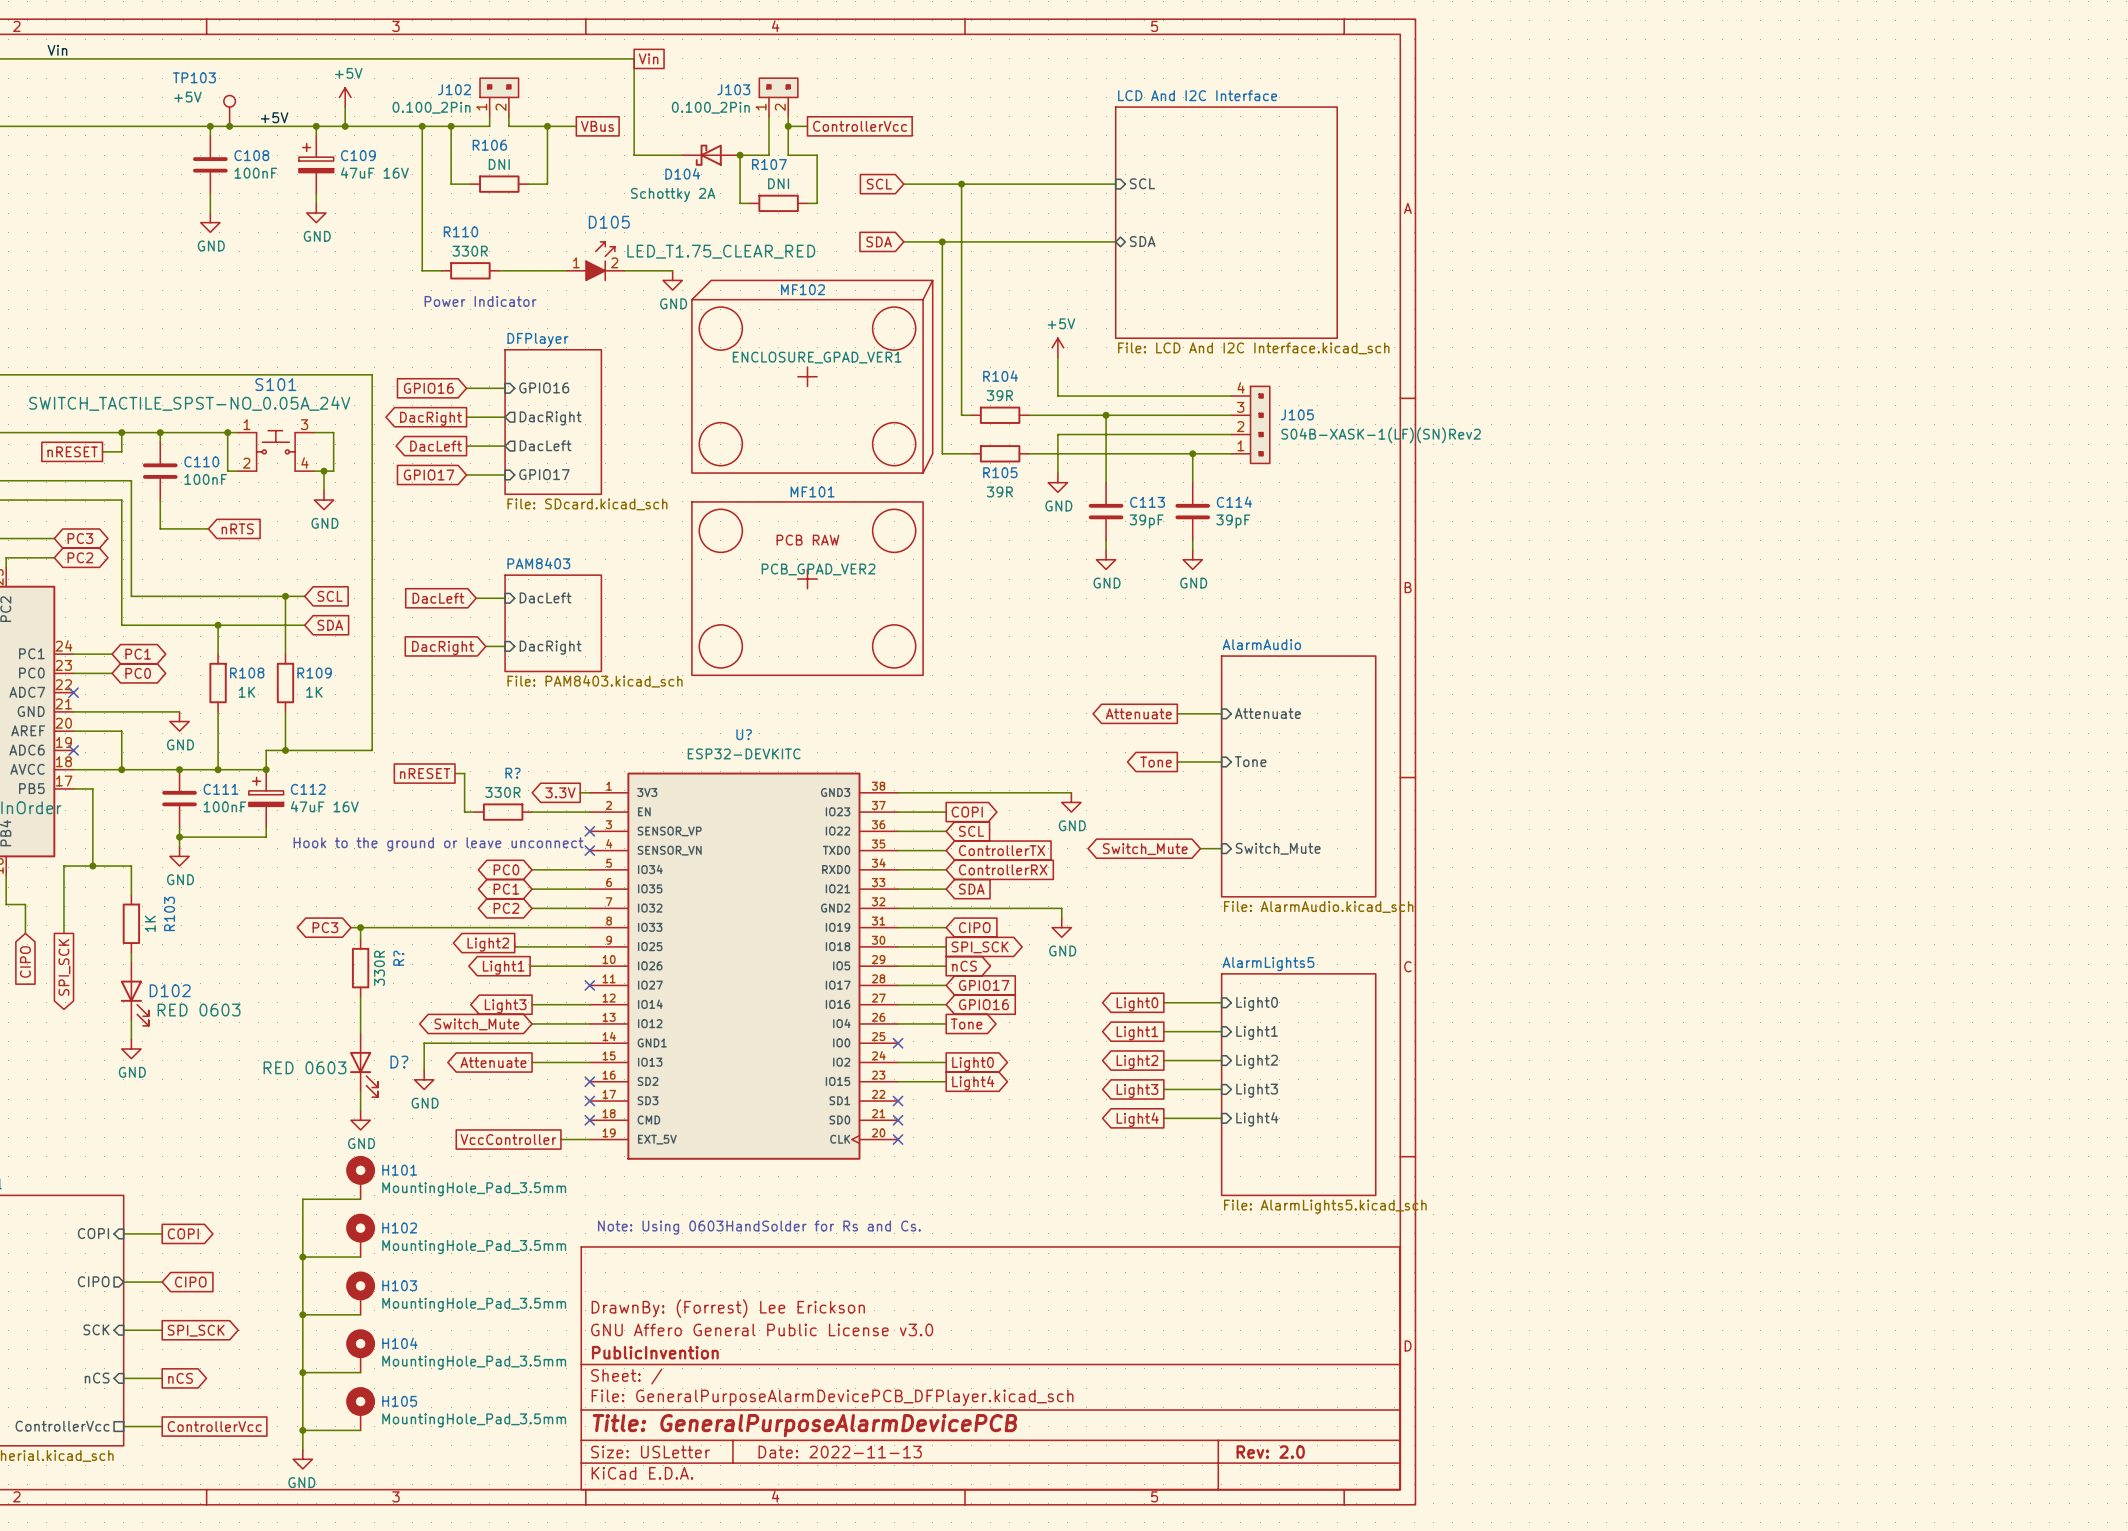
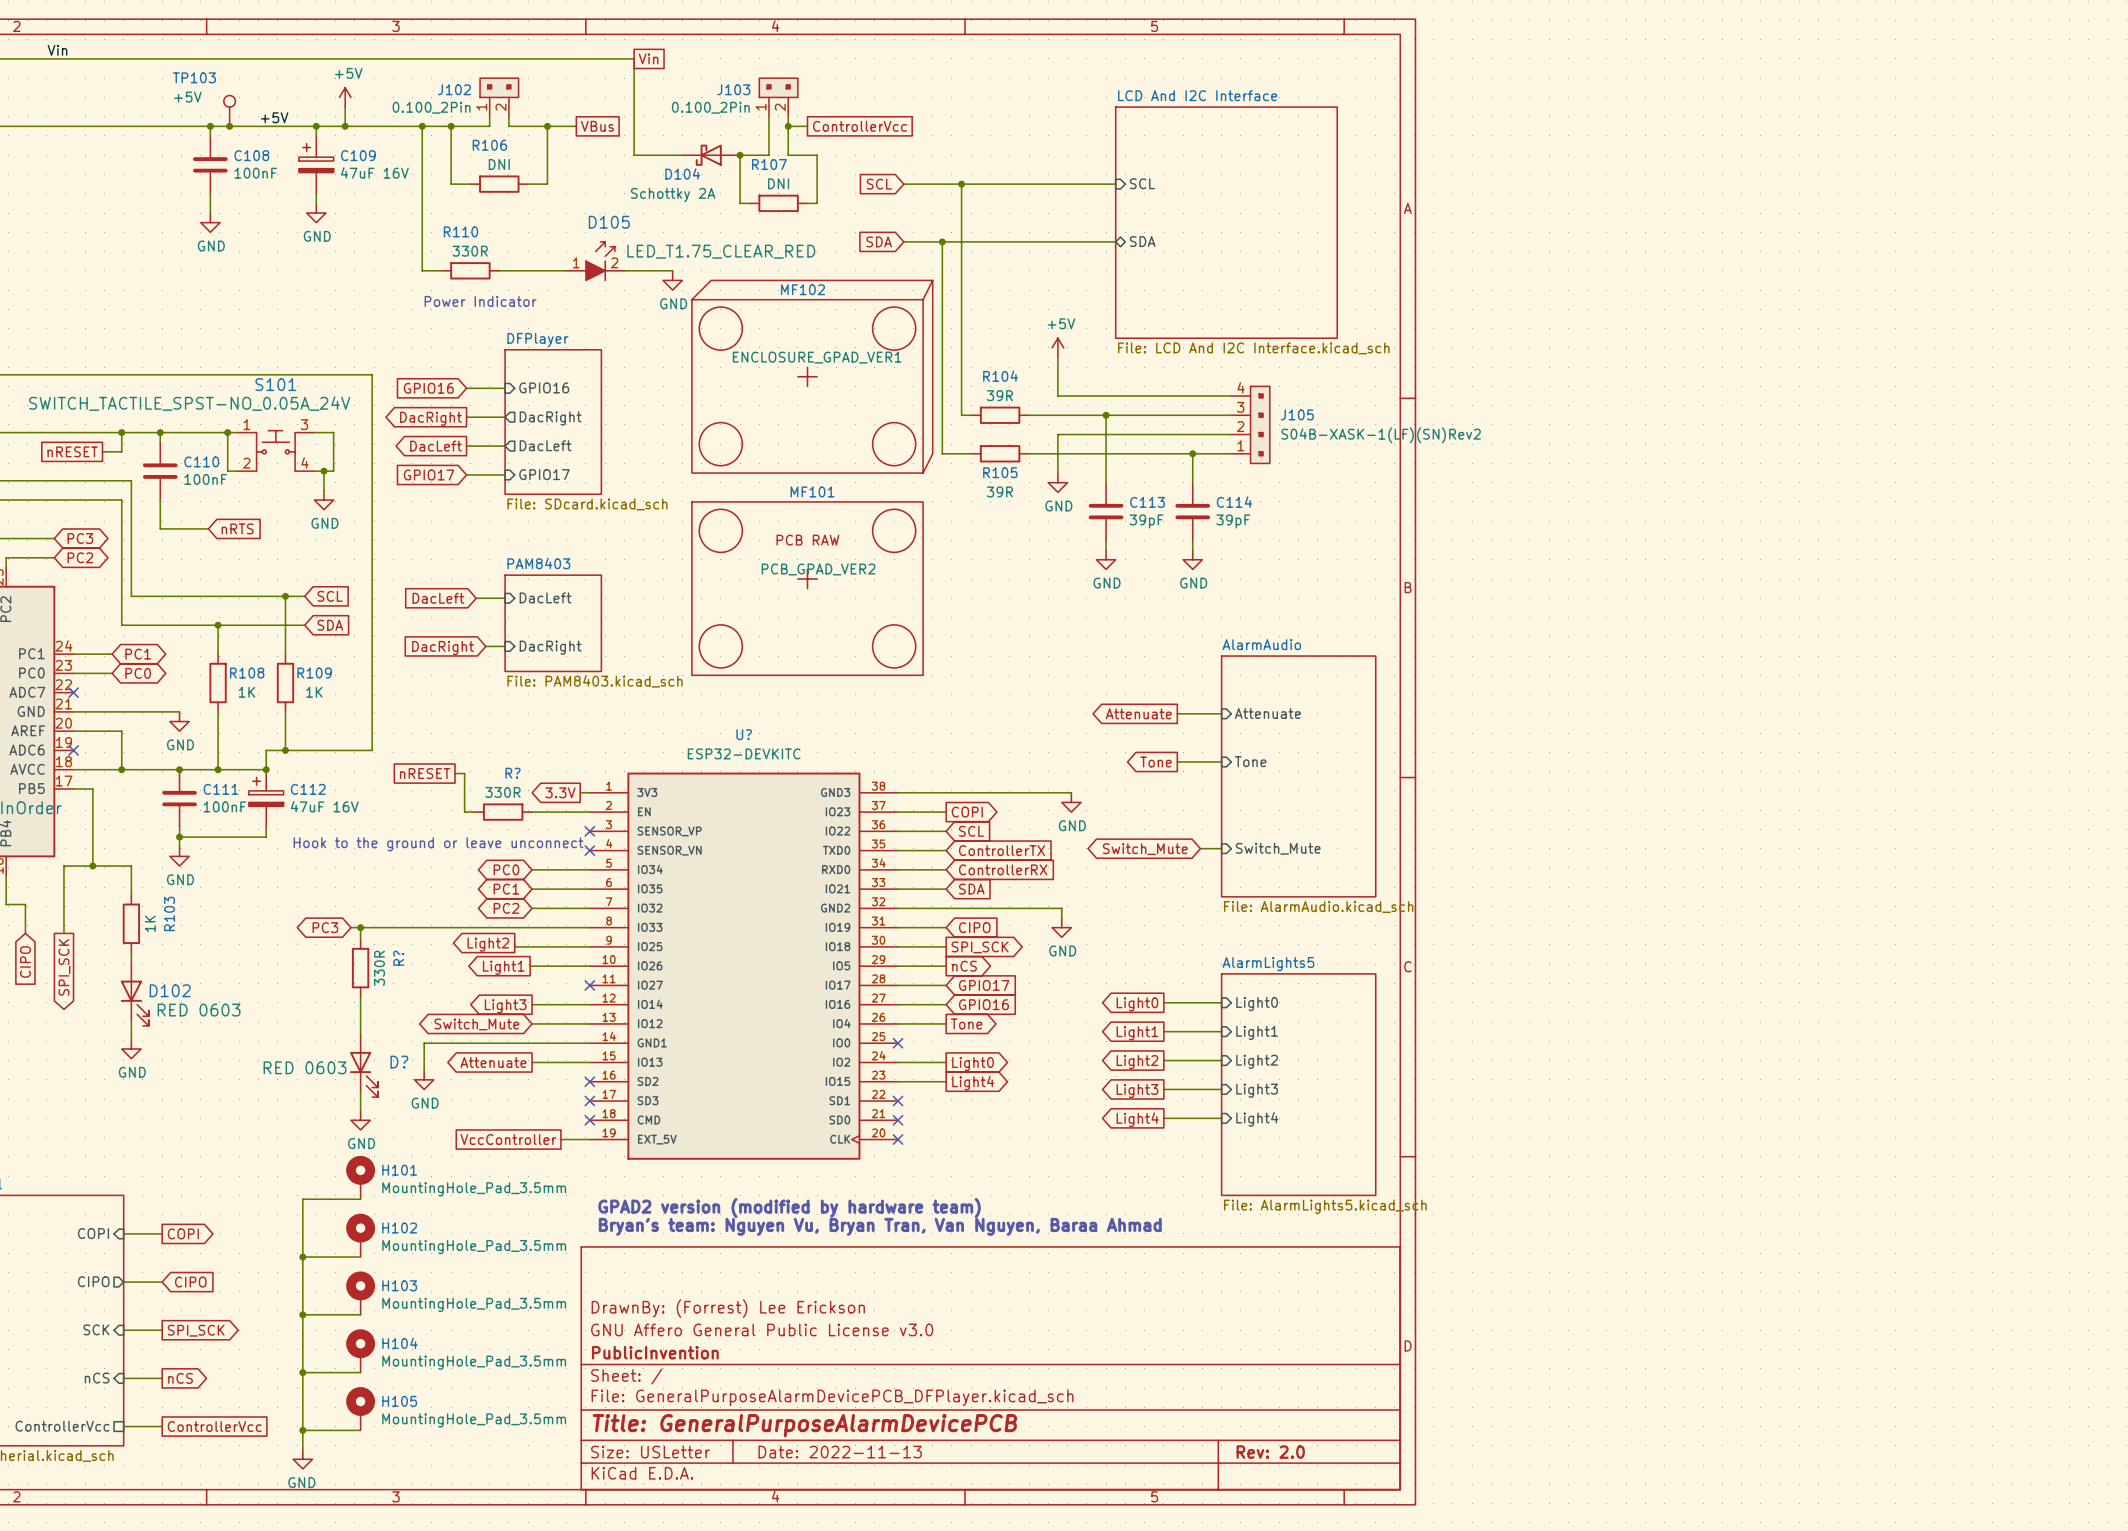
text: none -> GPAD2 version (modified by hardware team) (789, 1207)
text: Note: Using 0603HandSolder for Rs and Cs. (759, 1227) -> Bryan's team: Nguyen Vu, Bryan Tran, Van Nguyen, Baraa Ahmad (880, 1226)

